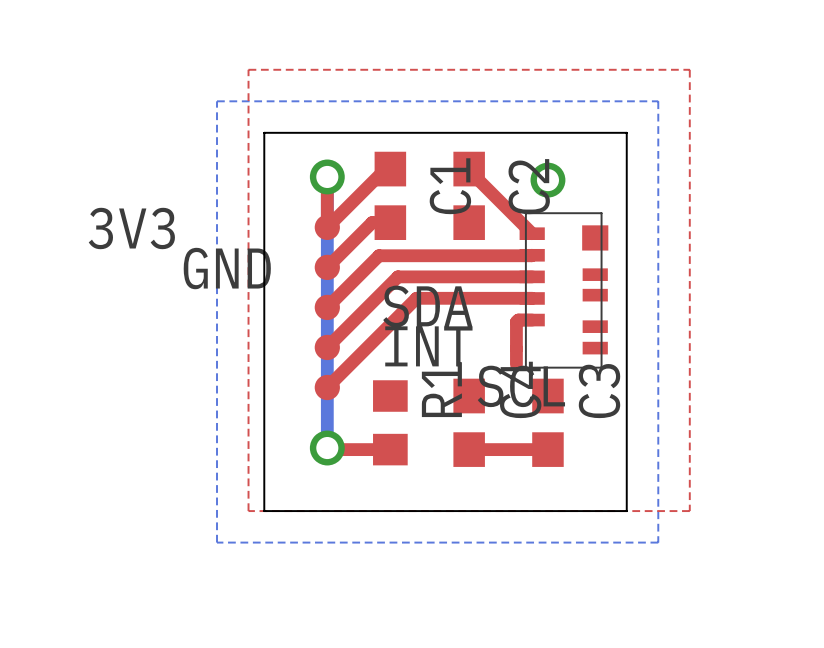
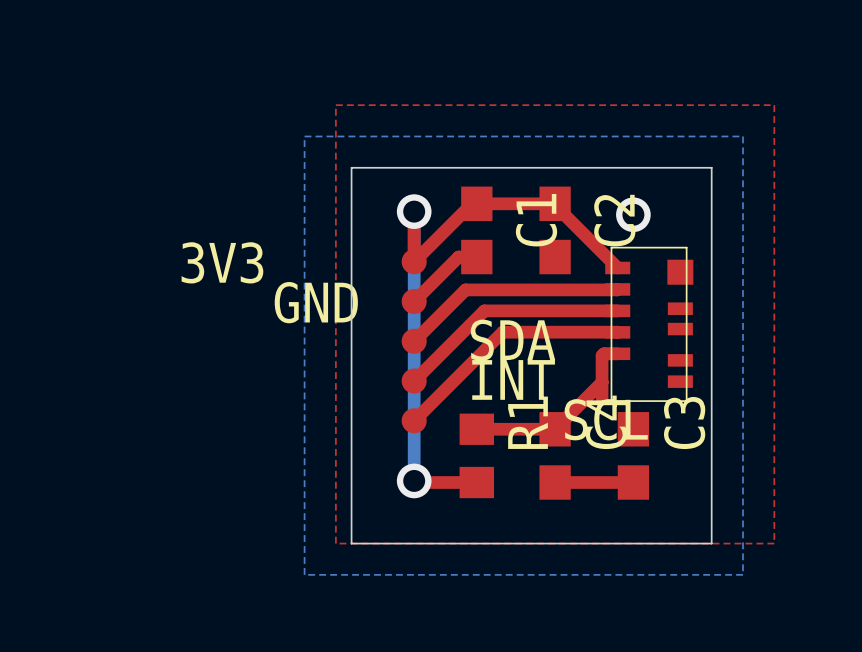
top track: none -> (476, 203) (555, 203) (555, 205)
top track: none -> (602, 382) (555, 429) (476, 429)

